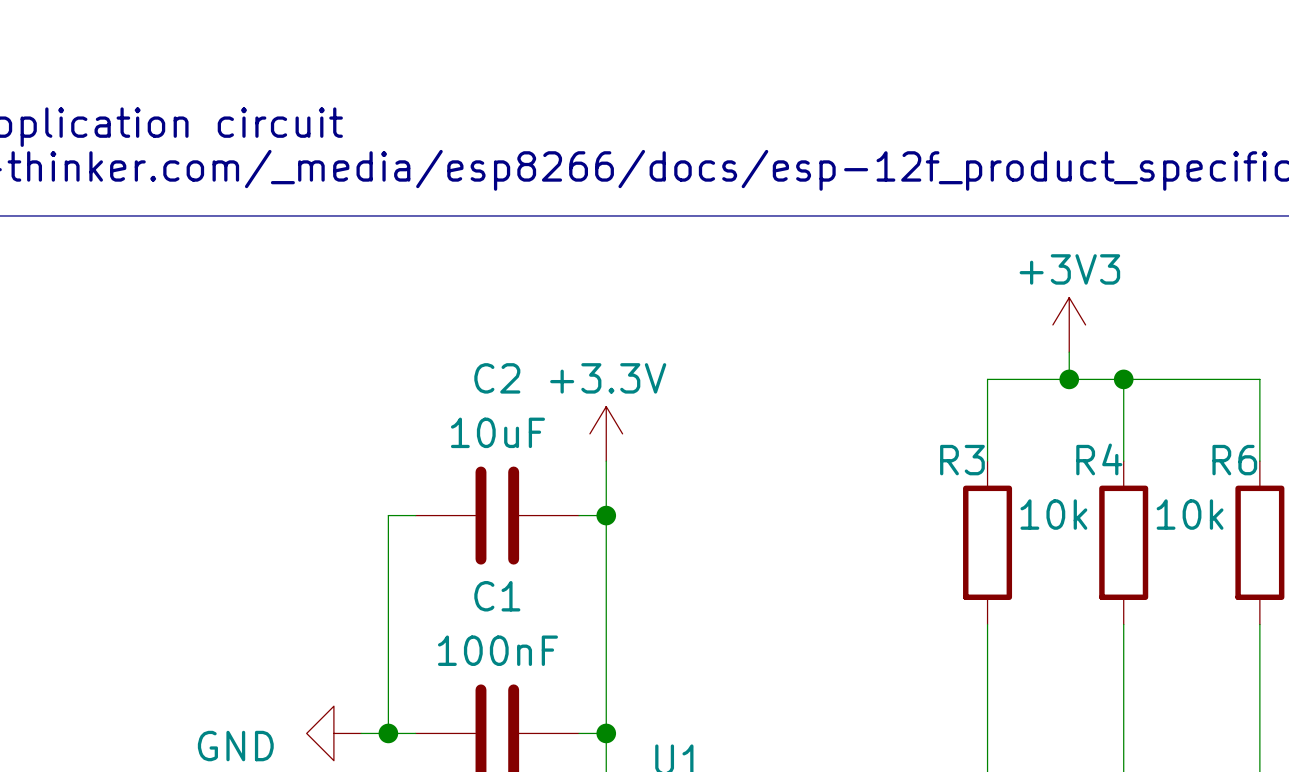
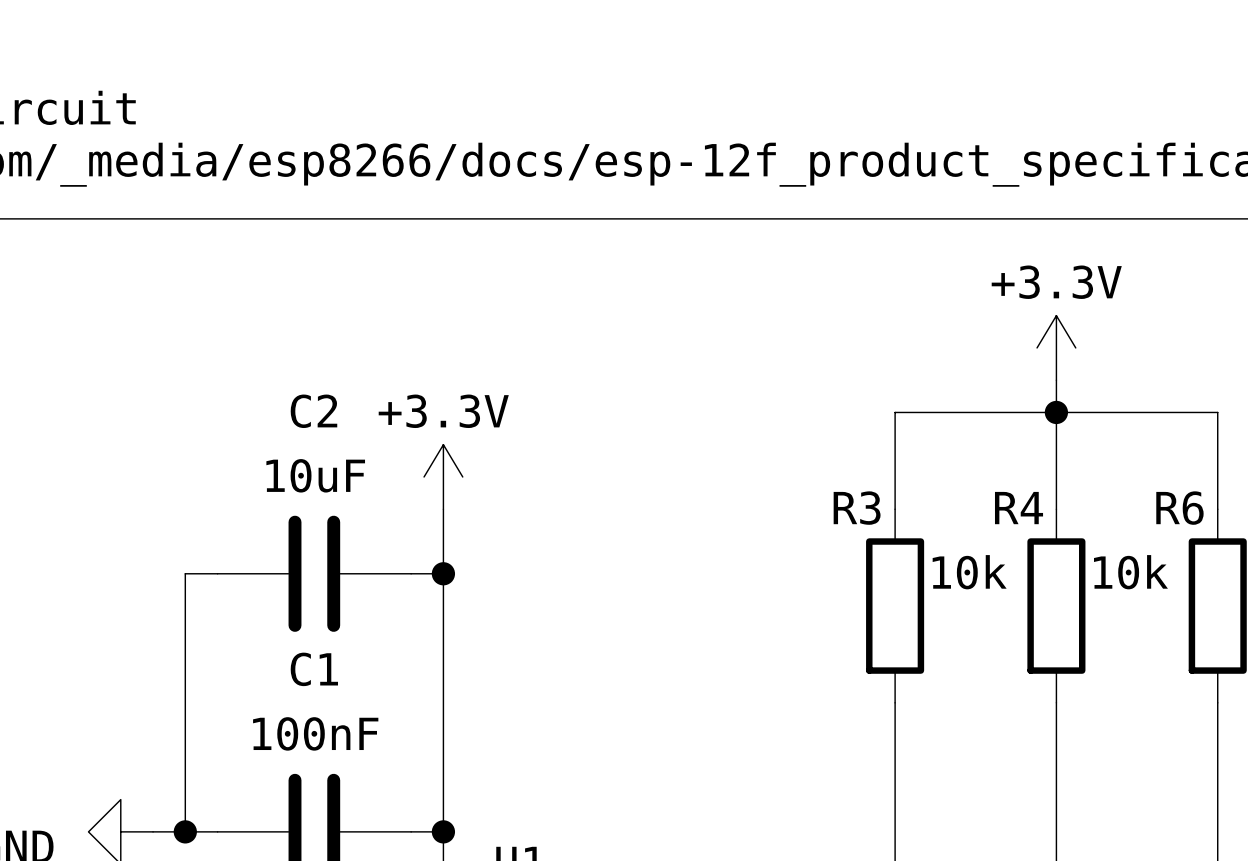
power symbol: +3V3 (1069, 324) -> none
power symbol: none -> +3.3V (1056, 347)
wire: (1069, 352) (1069, 379) -> (1056, 380) (1056, 412)
junction: (1069, 379) -> none

